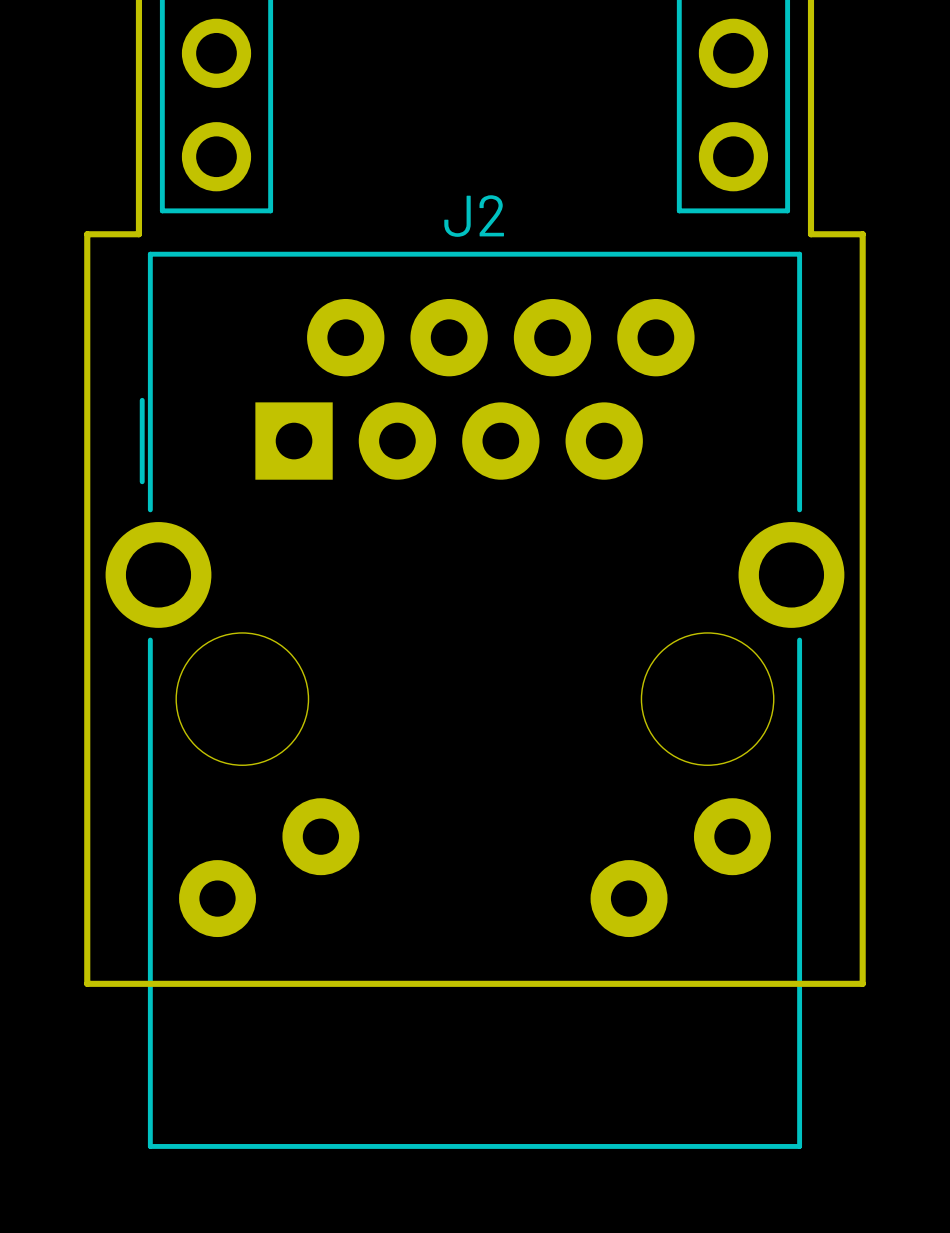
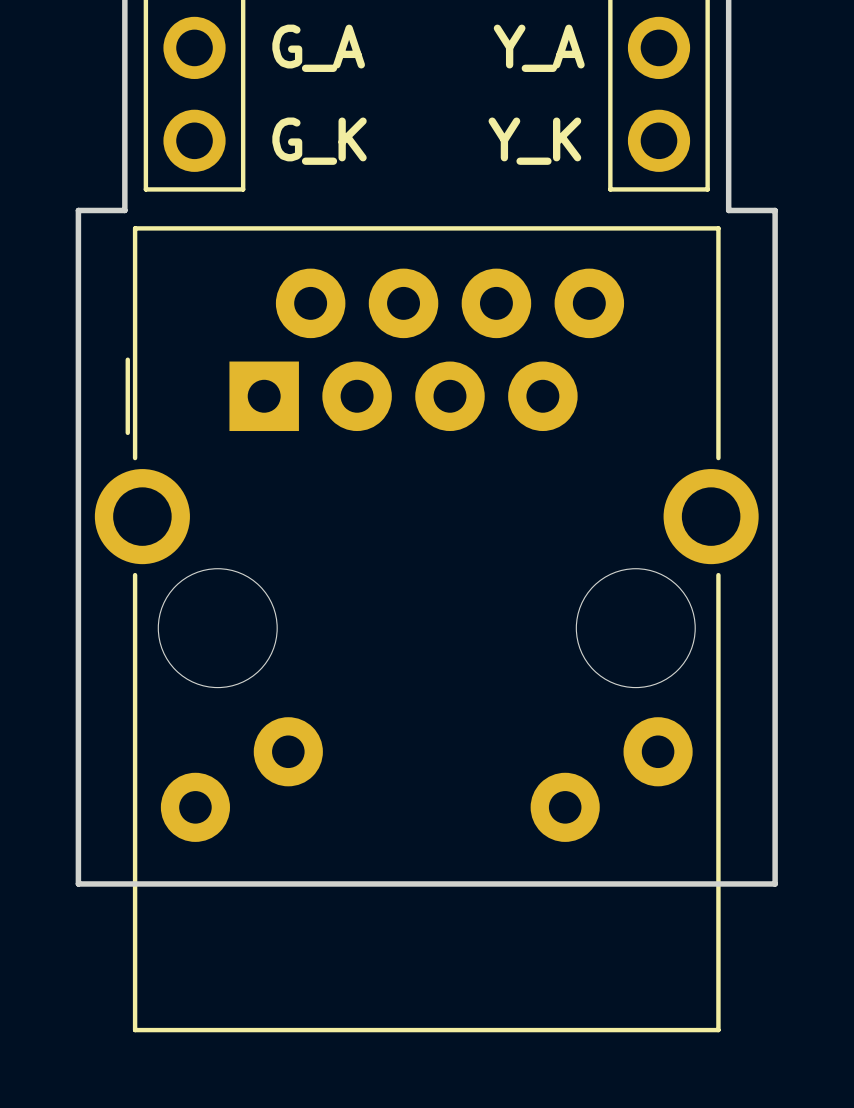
text: none -> G_A (318, 48)
text: none -> Y_A (539, 48)
text: none -> G_K (319, 141)
text: none -> Y_K (534, 141)
J2 name: J2 (474, 216) -> none

